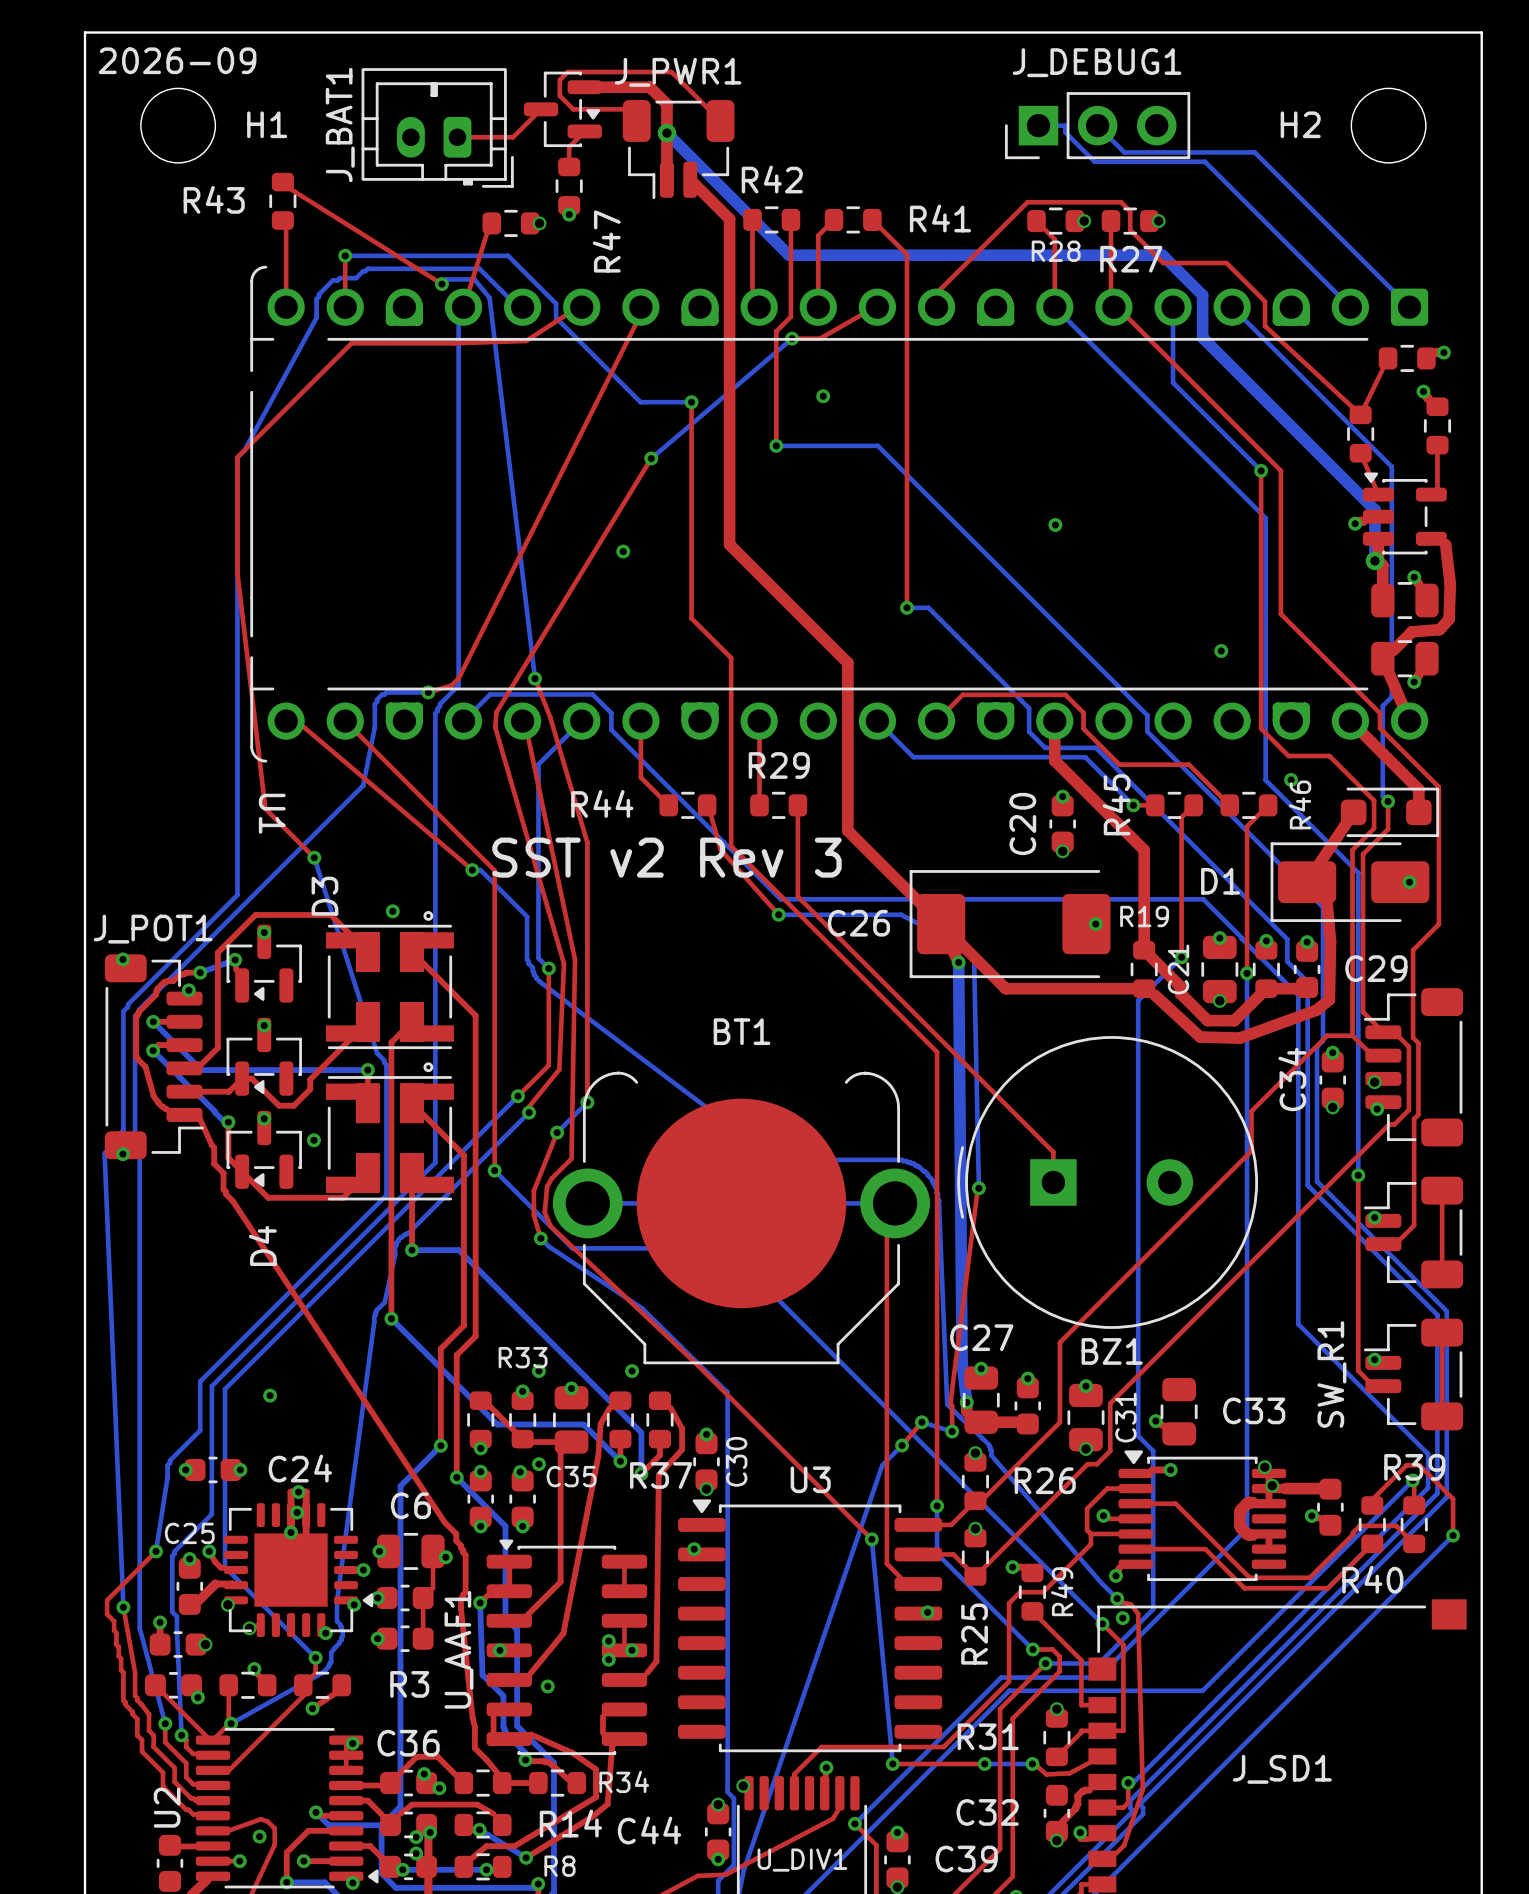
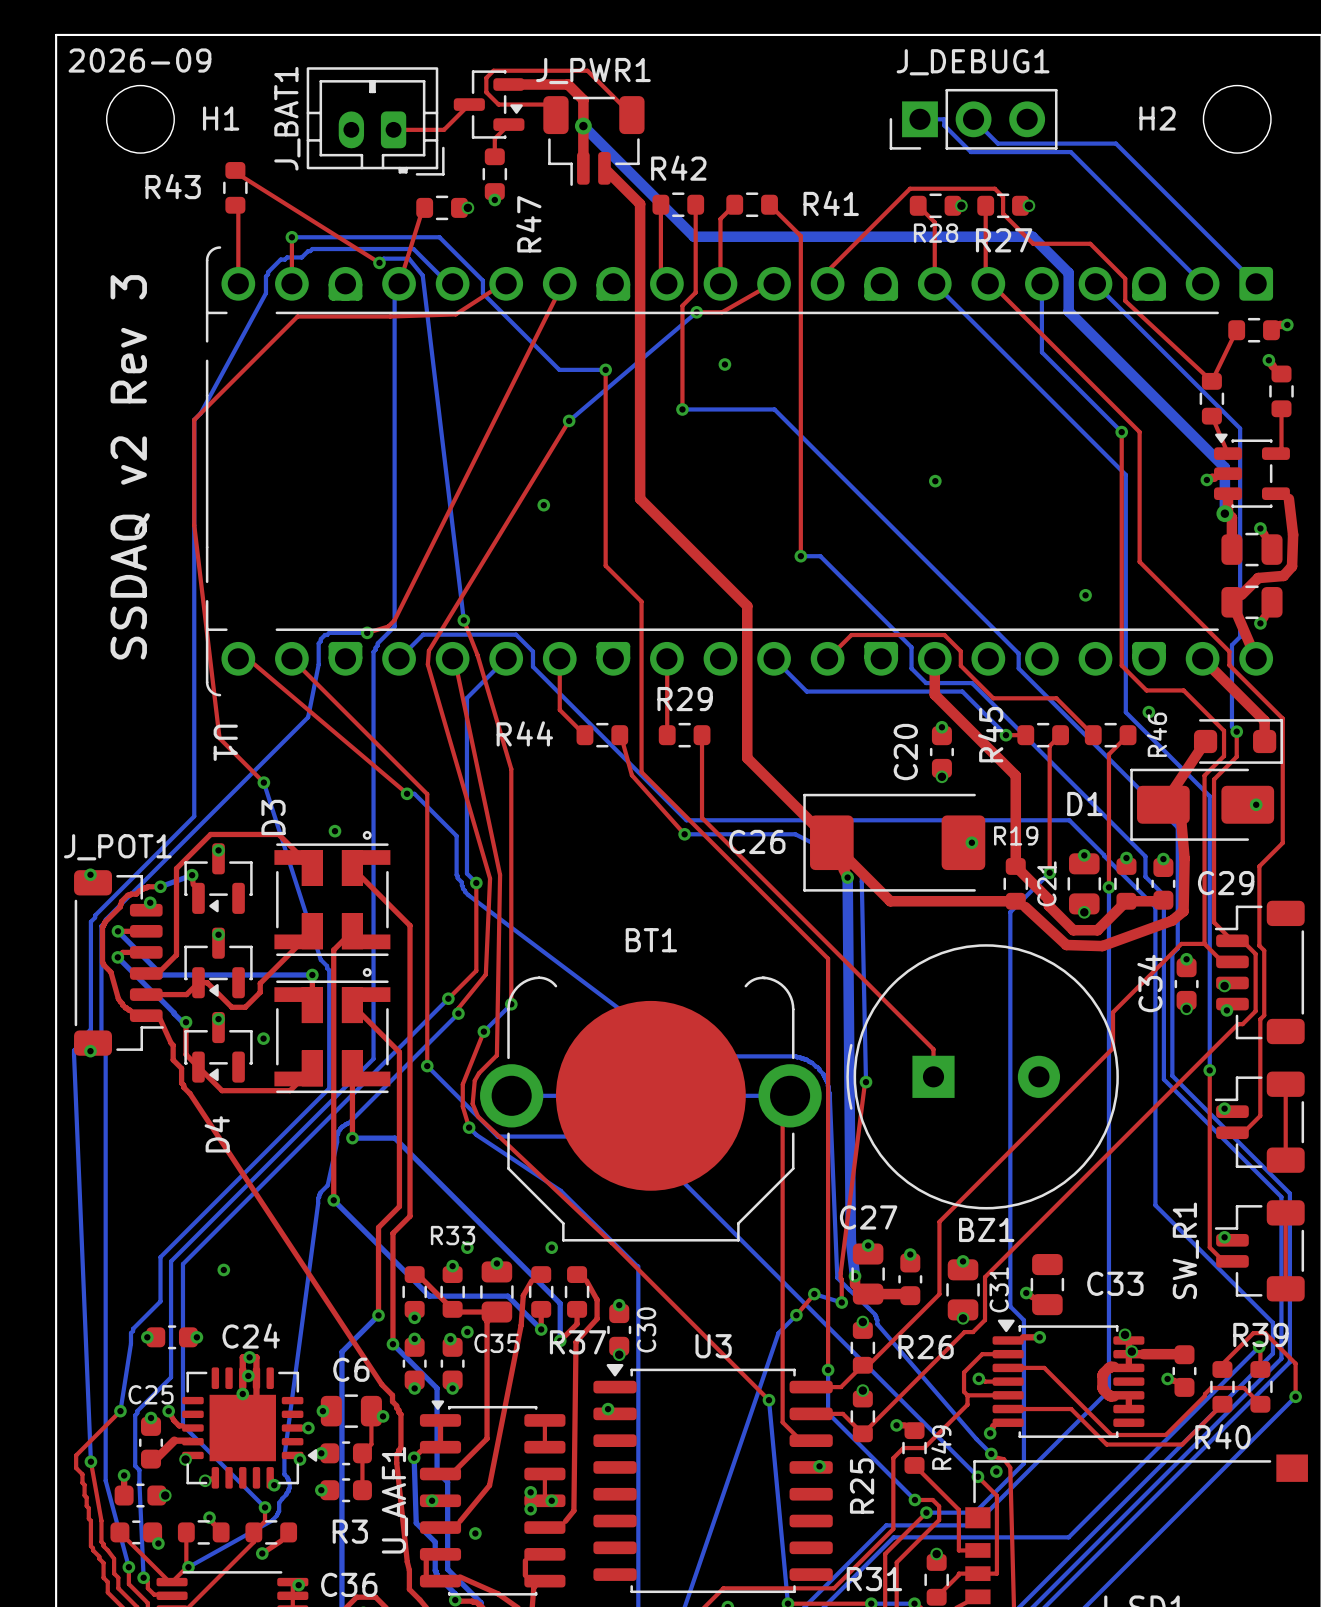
text: none -> SSDAQ v2 Rev 3 (130, 467)
text: SST v2 Rev 3 (666, 857) -> none

